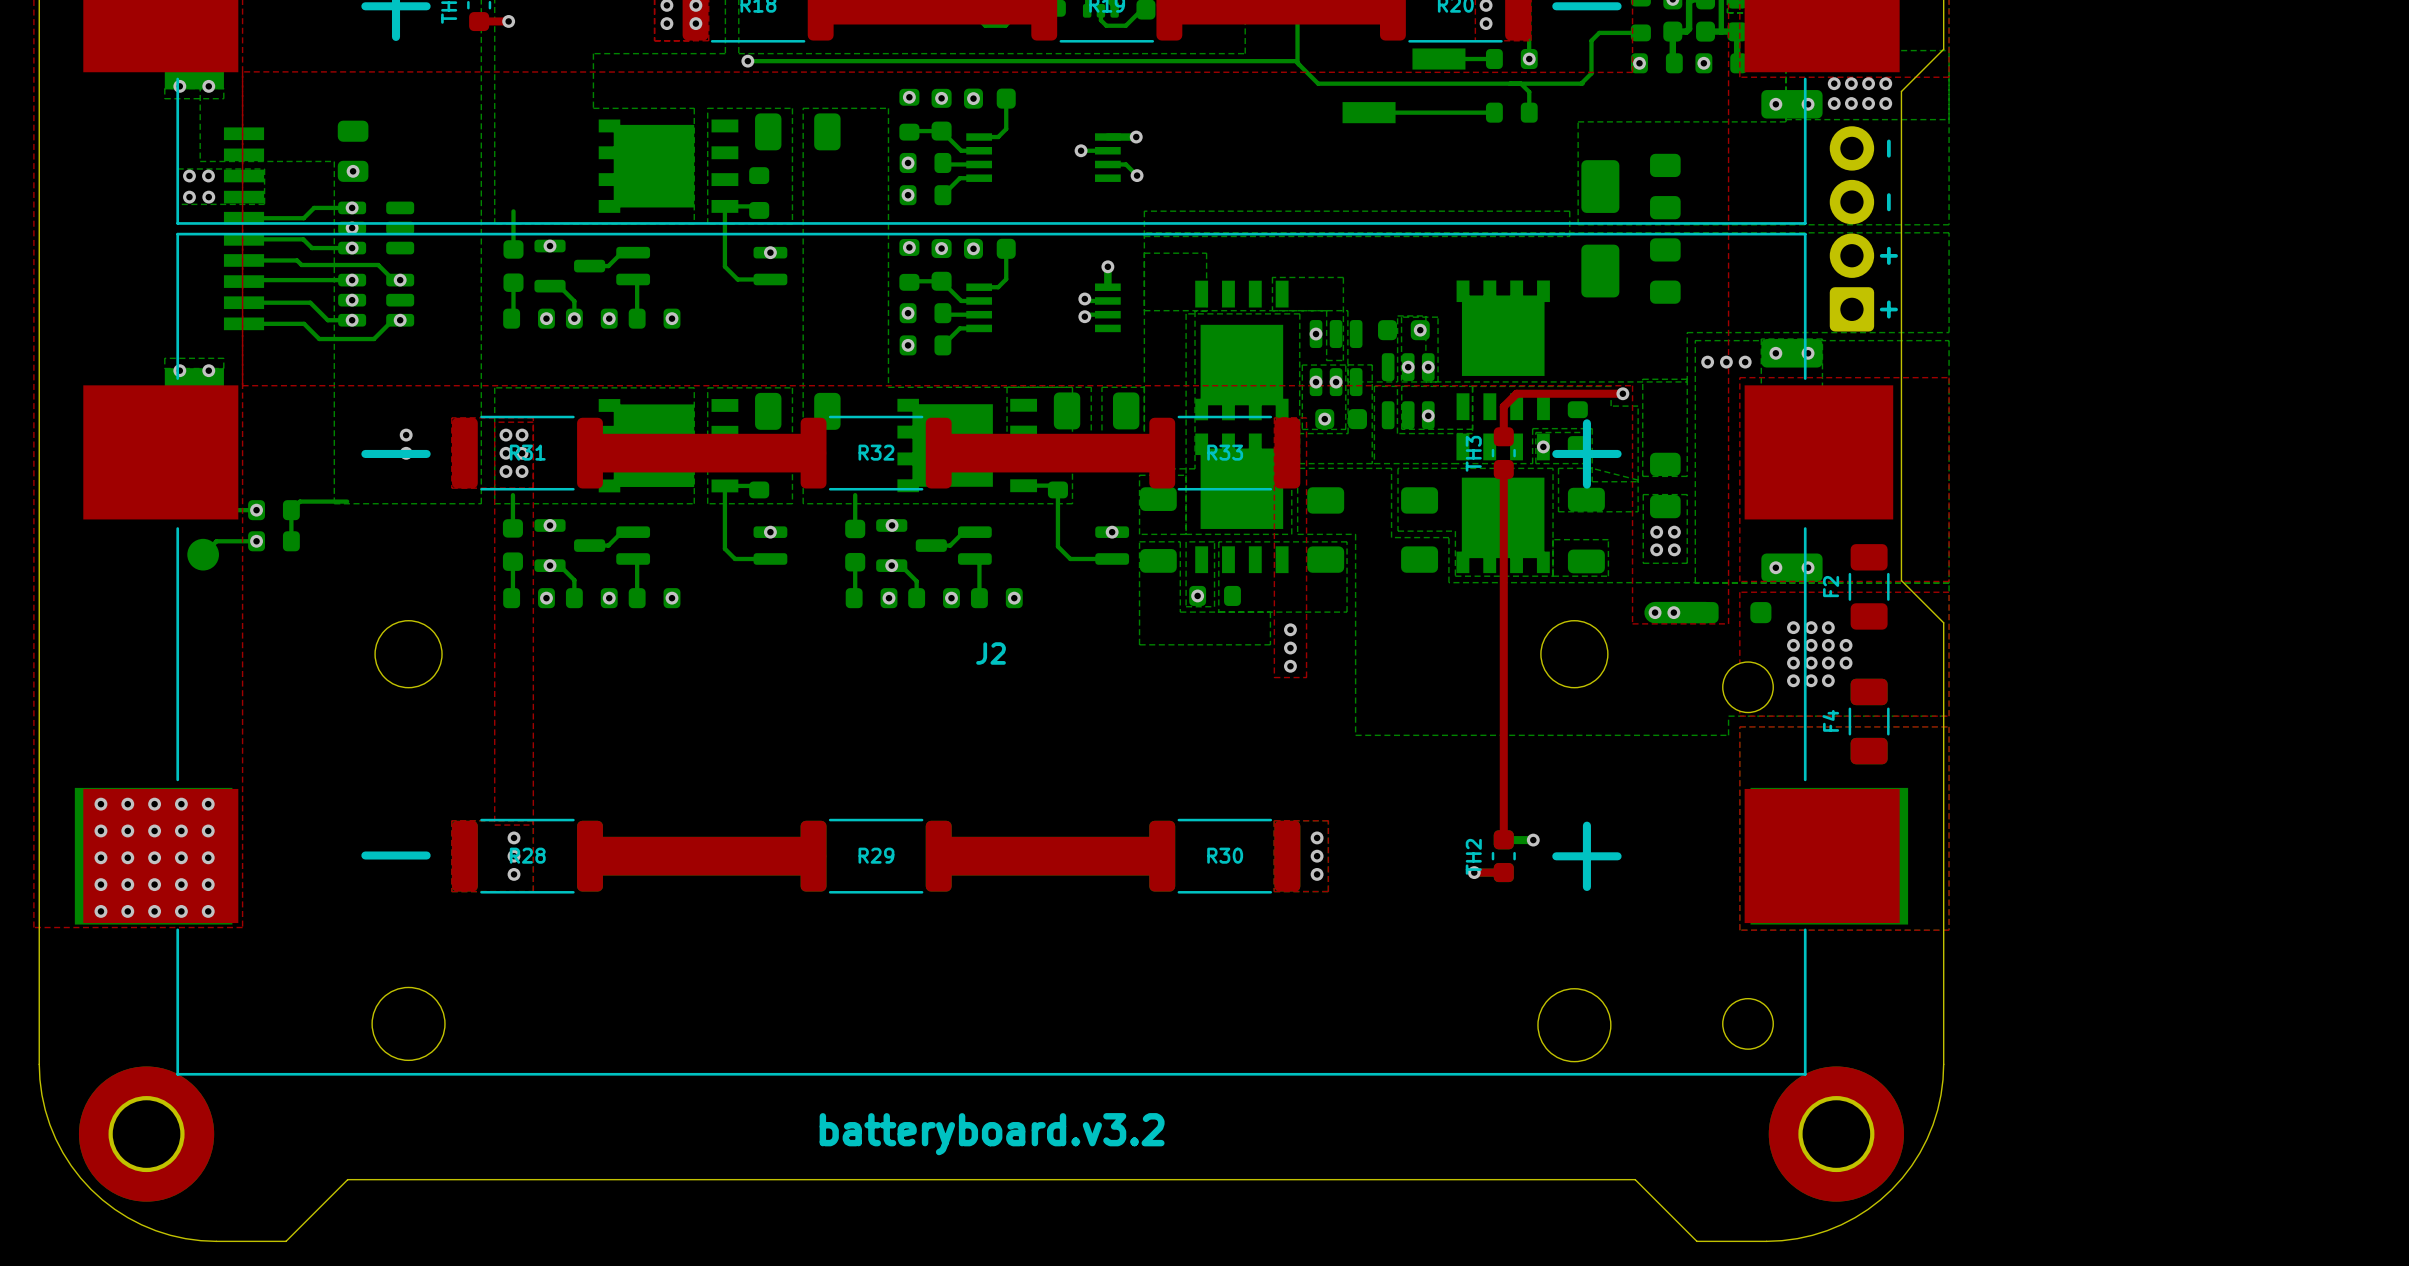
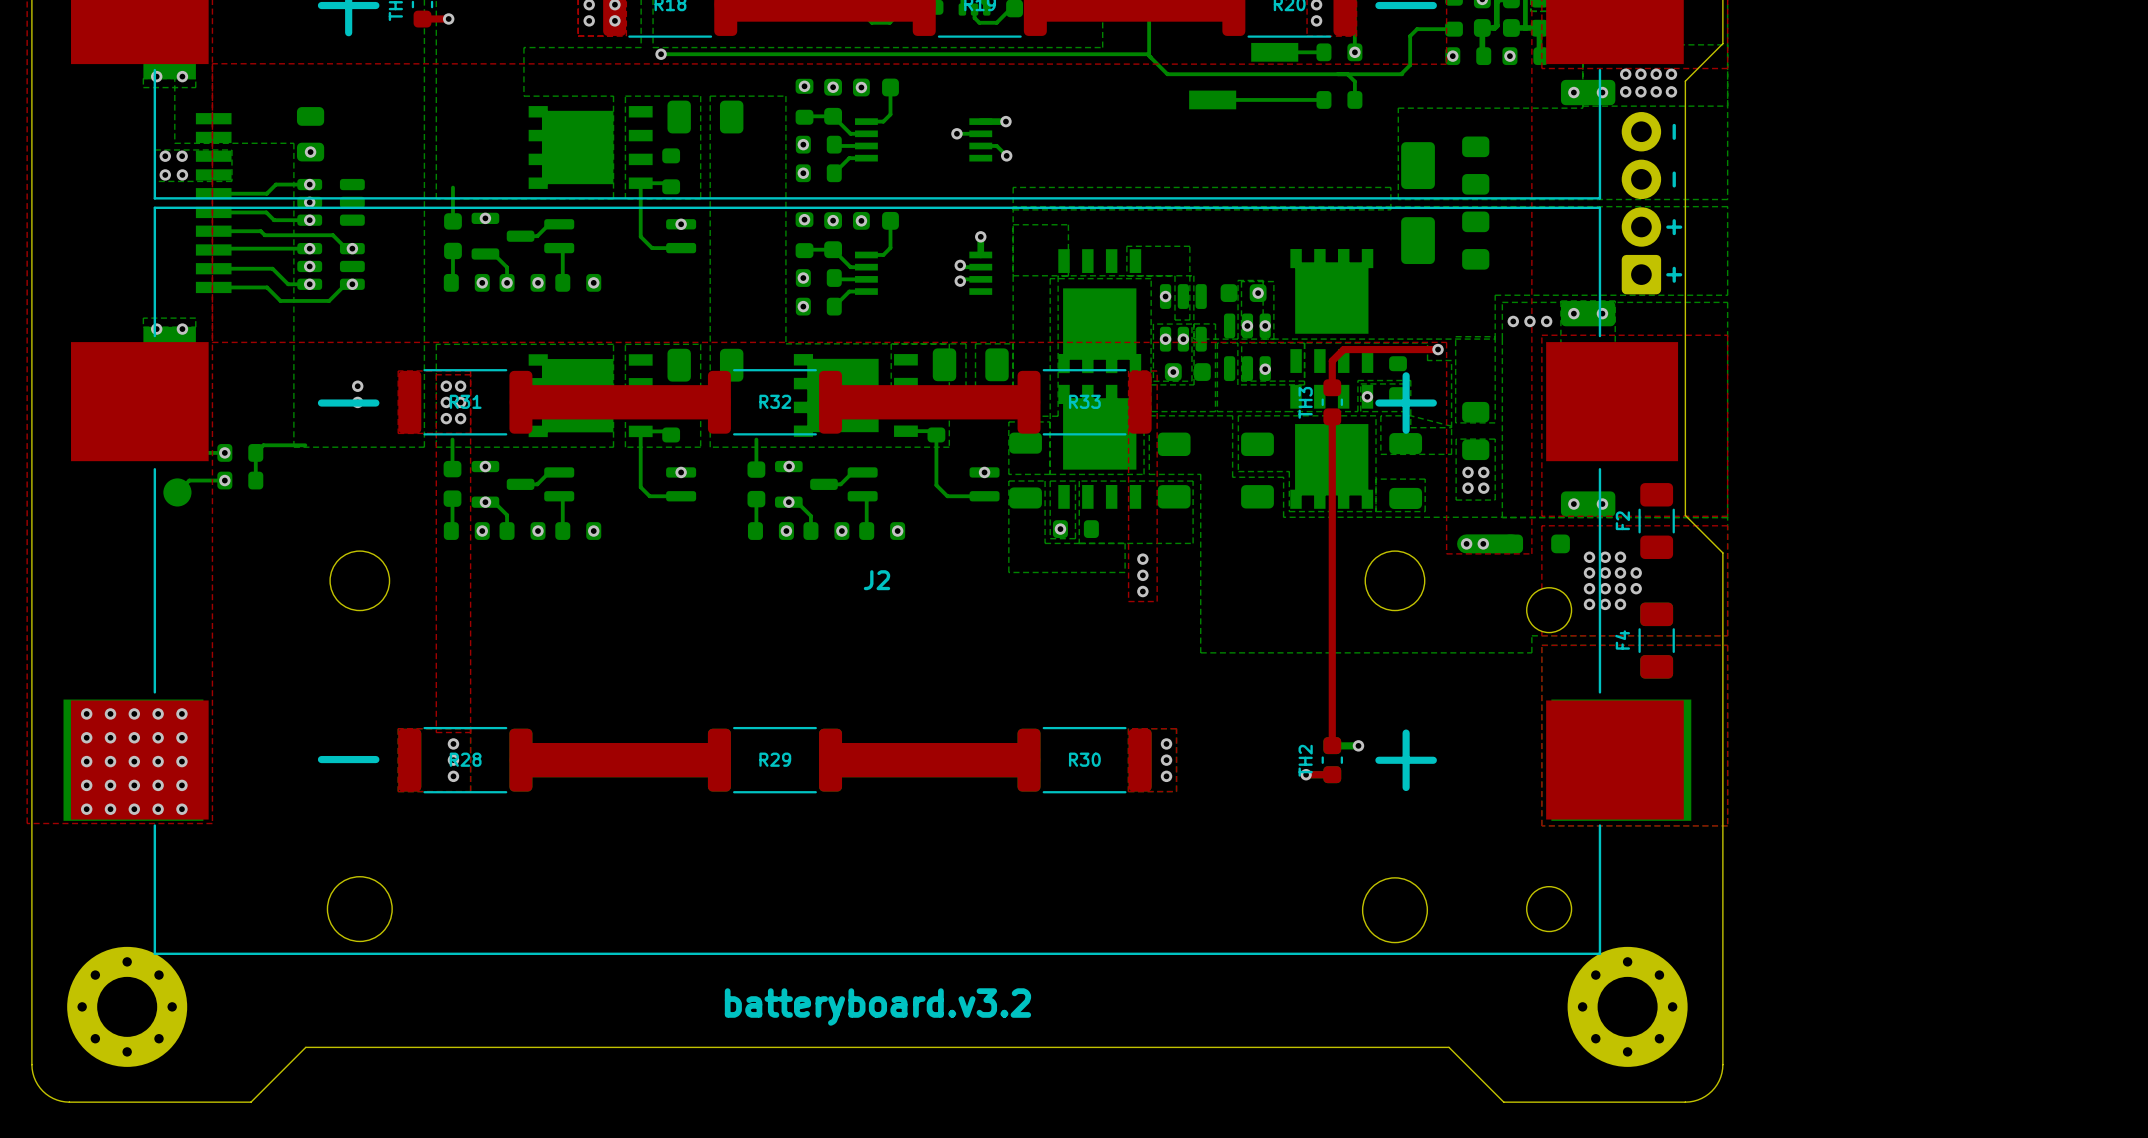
board edge: (39, 1064) (41, 1095) (49, 1124) (62, 1152) (91, 1189) (127, 1217) (155, 1230) (185, 1238) (216, 1241) -> (31, 944) (32, 1068) (35, 1080) (42, 1091) (53, 1098) (65, 1101) (189, 1102)
board edge: (1943, 1064) (1937, 1110) (1927, 1139) (1911, 1165) (1891, 1189) (1868, 1209) (1841, 1224) (1812, 1235) (1766, 1241) -> (1722, 944) (1722, 1068) (1719, 1080) (1711, 1091) (1701, 1098) (1689, 1101) (1565, 1102)
part footprint: [78, 1066, 215, 1202] -> [67, 946, 188, 1067]
part footprint: [1768, 1066, 1904, 1202] -> [1567, 946, 1688, 1067]

